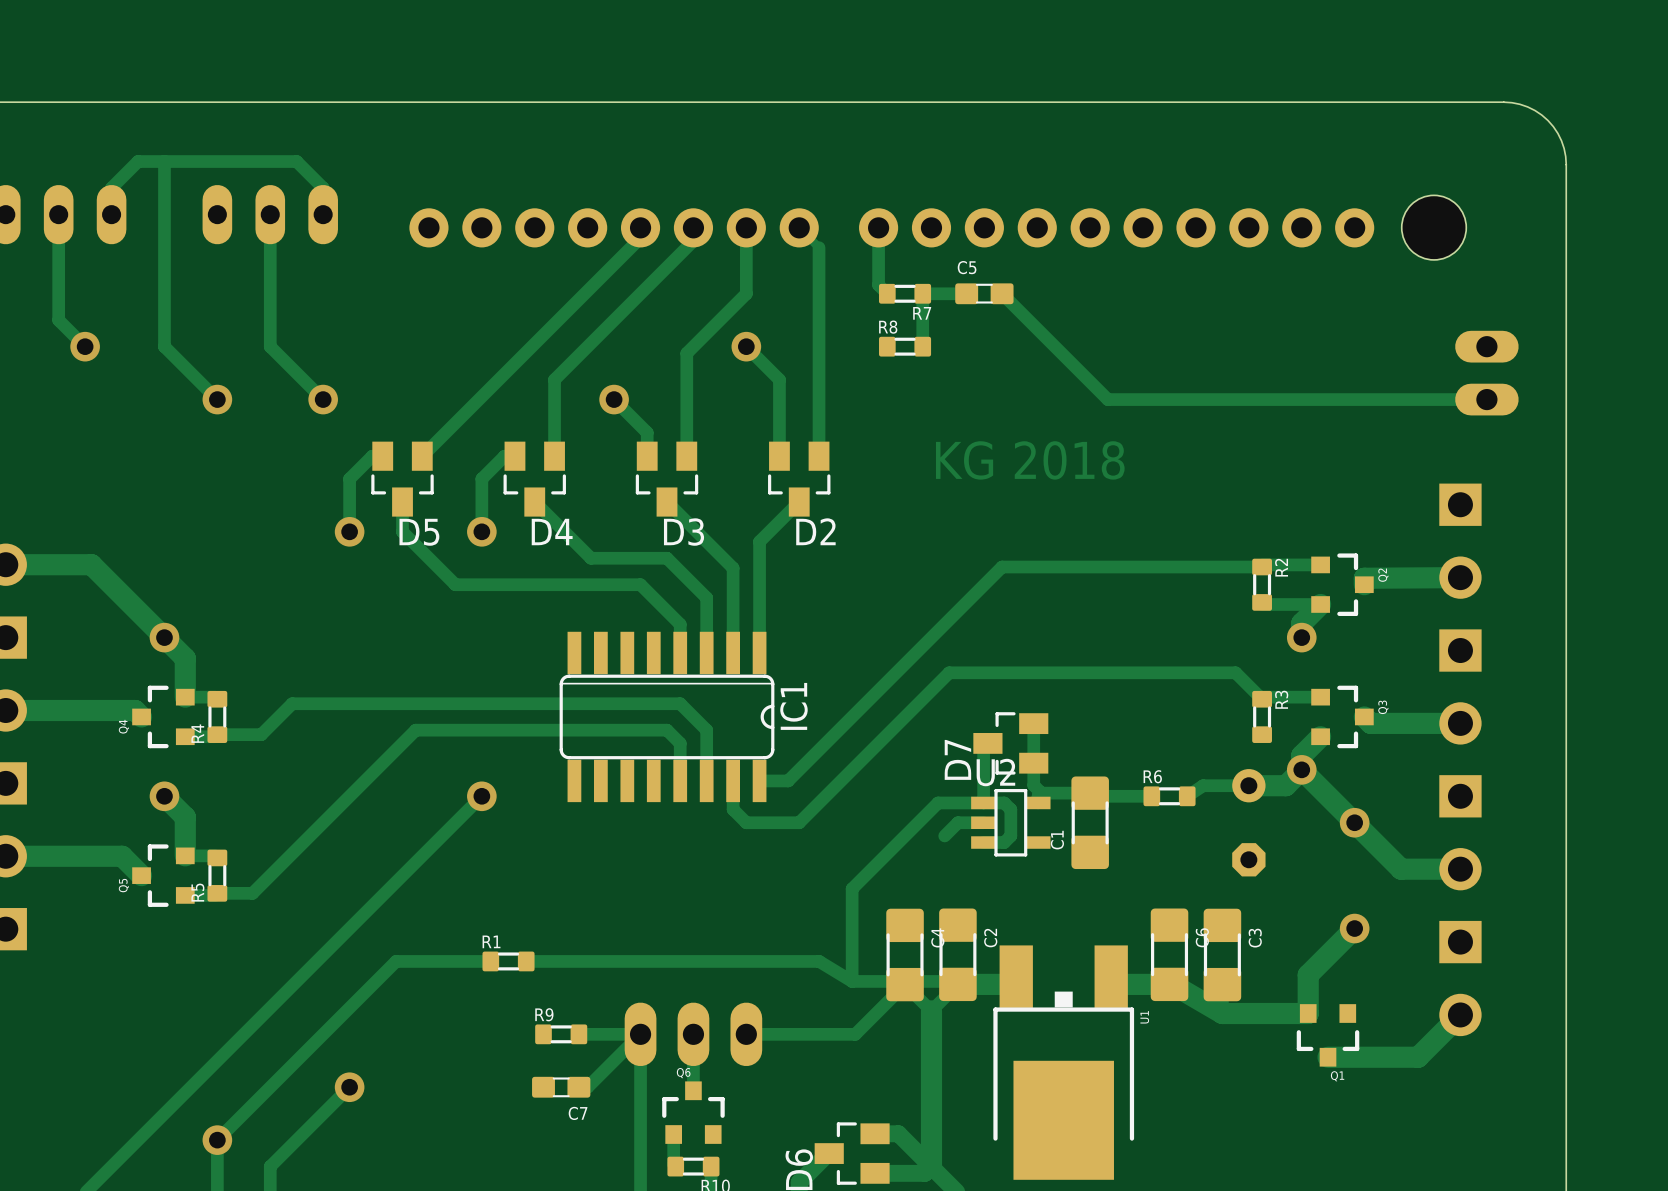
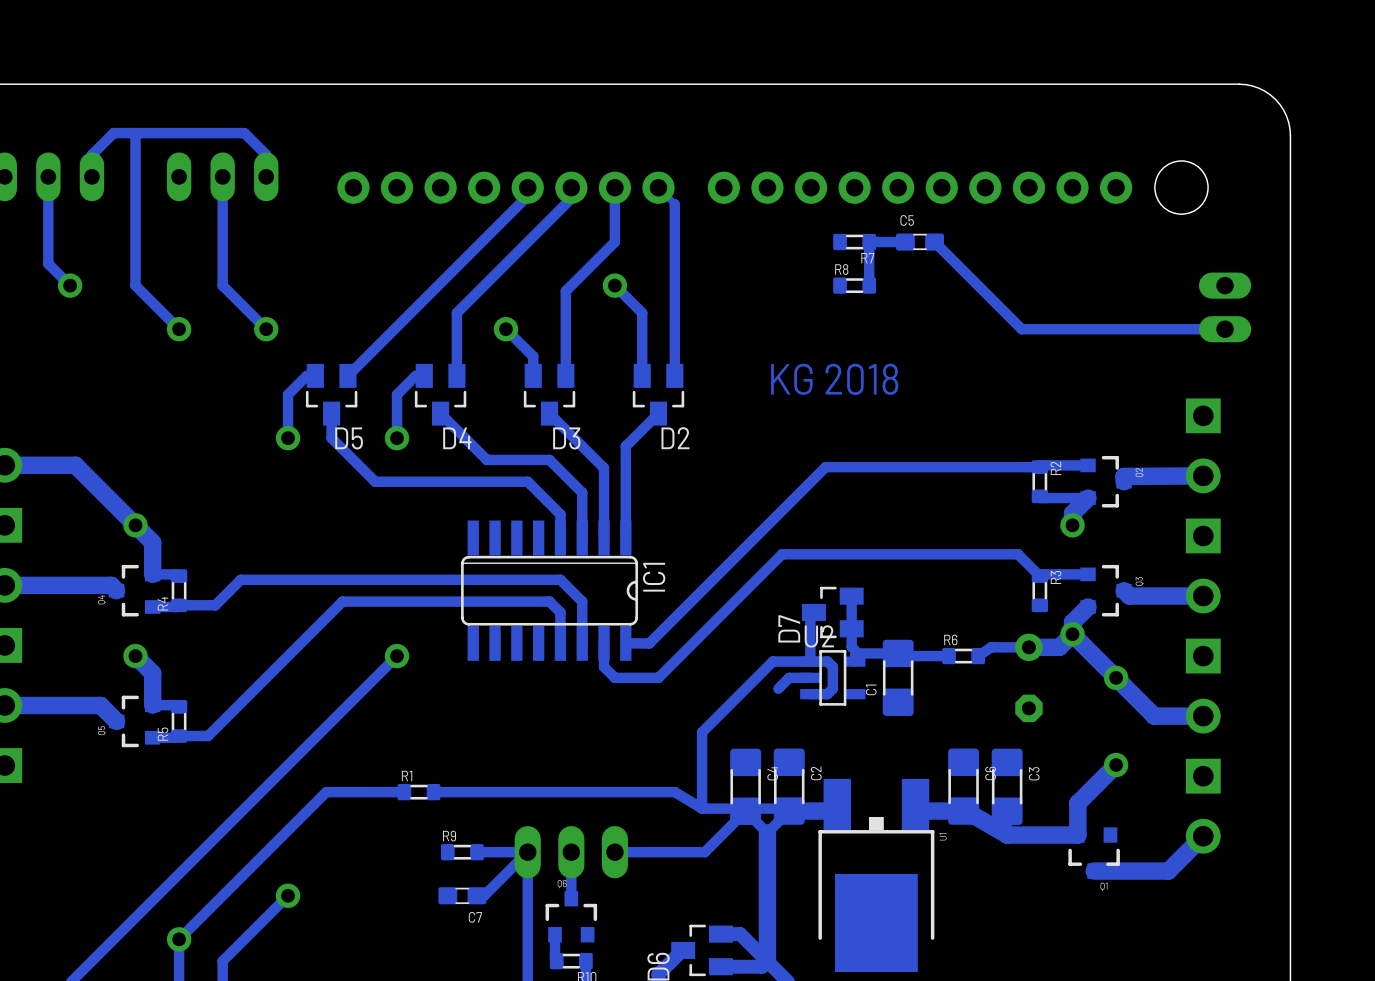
track: (878, 227) (878, 285) (887, 293) -> none
R7 position: (905, 293) -> (854, 242)
track: (966, 293) (922, 293) (922, 346) -> (905, 242) (869, 242) (869, 285)
C5 position: (984, 293) -> (919, 242)
track: (1002, 293) (1107, 399) (1240, 399) -> (934, 242) (1021, 329)
R8 position: (905, 346) -> (854, 285)

